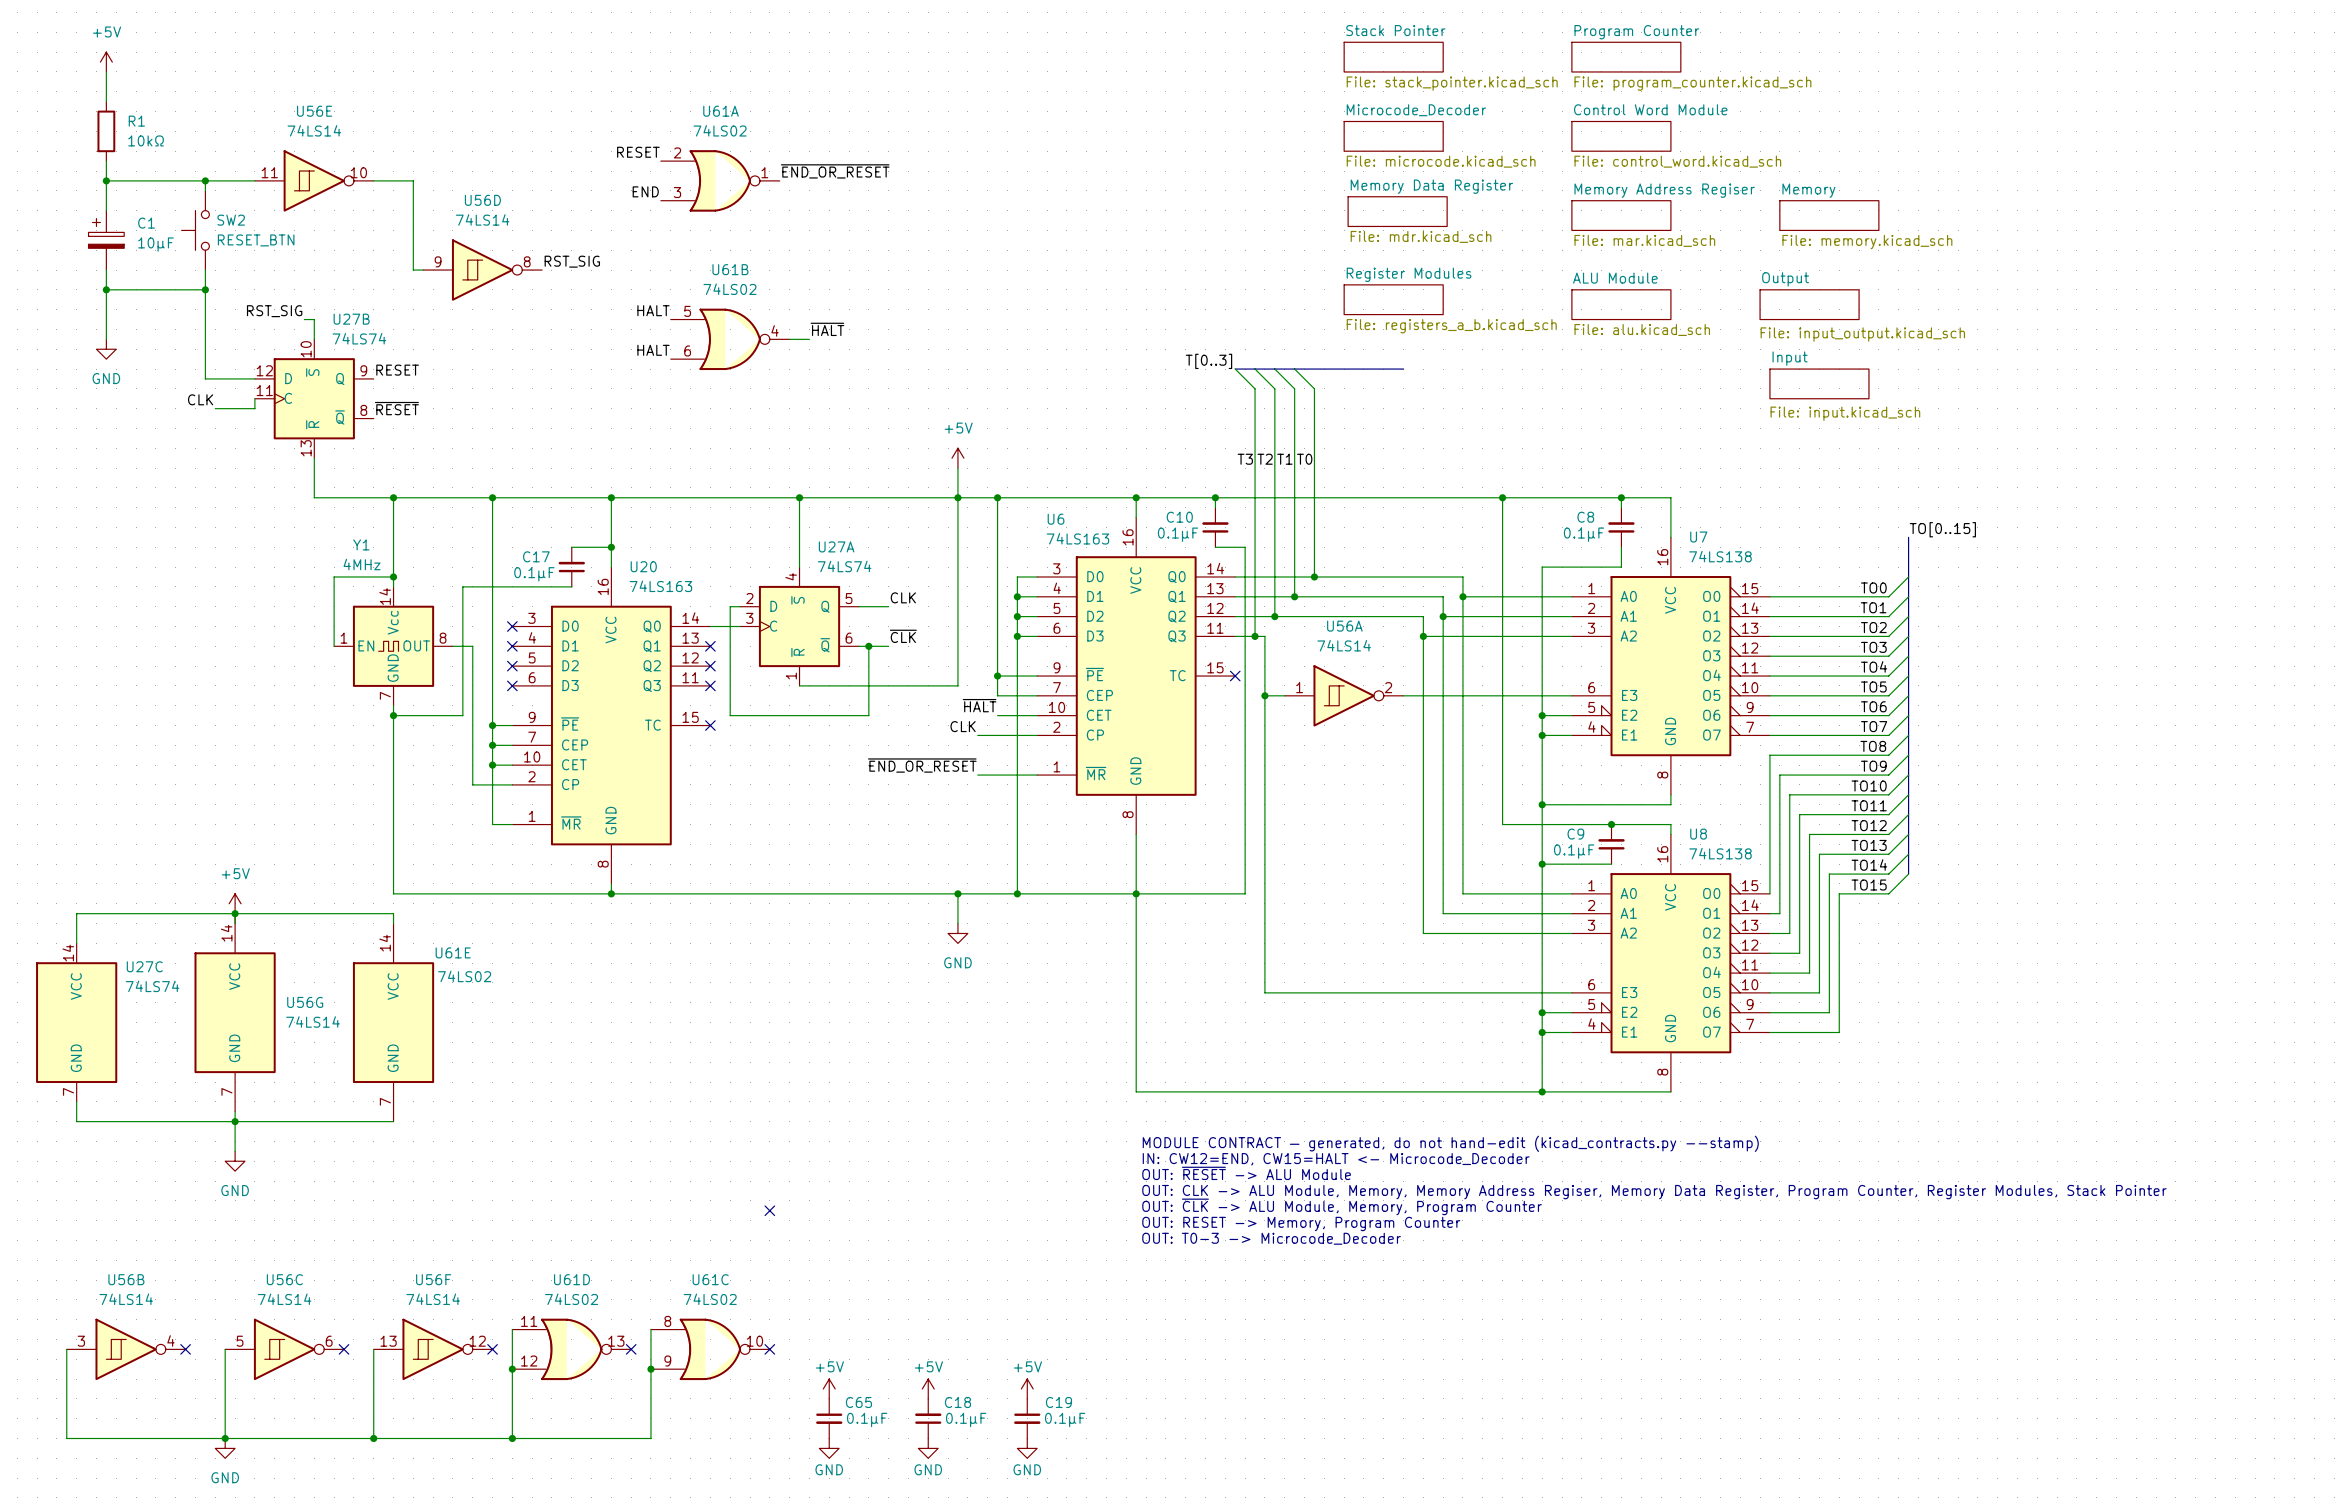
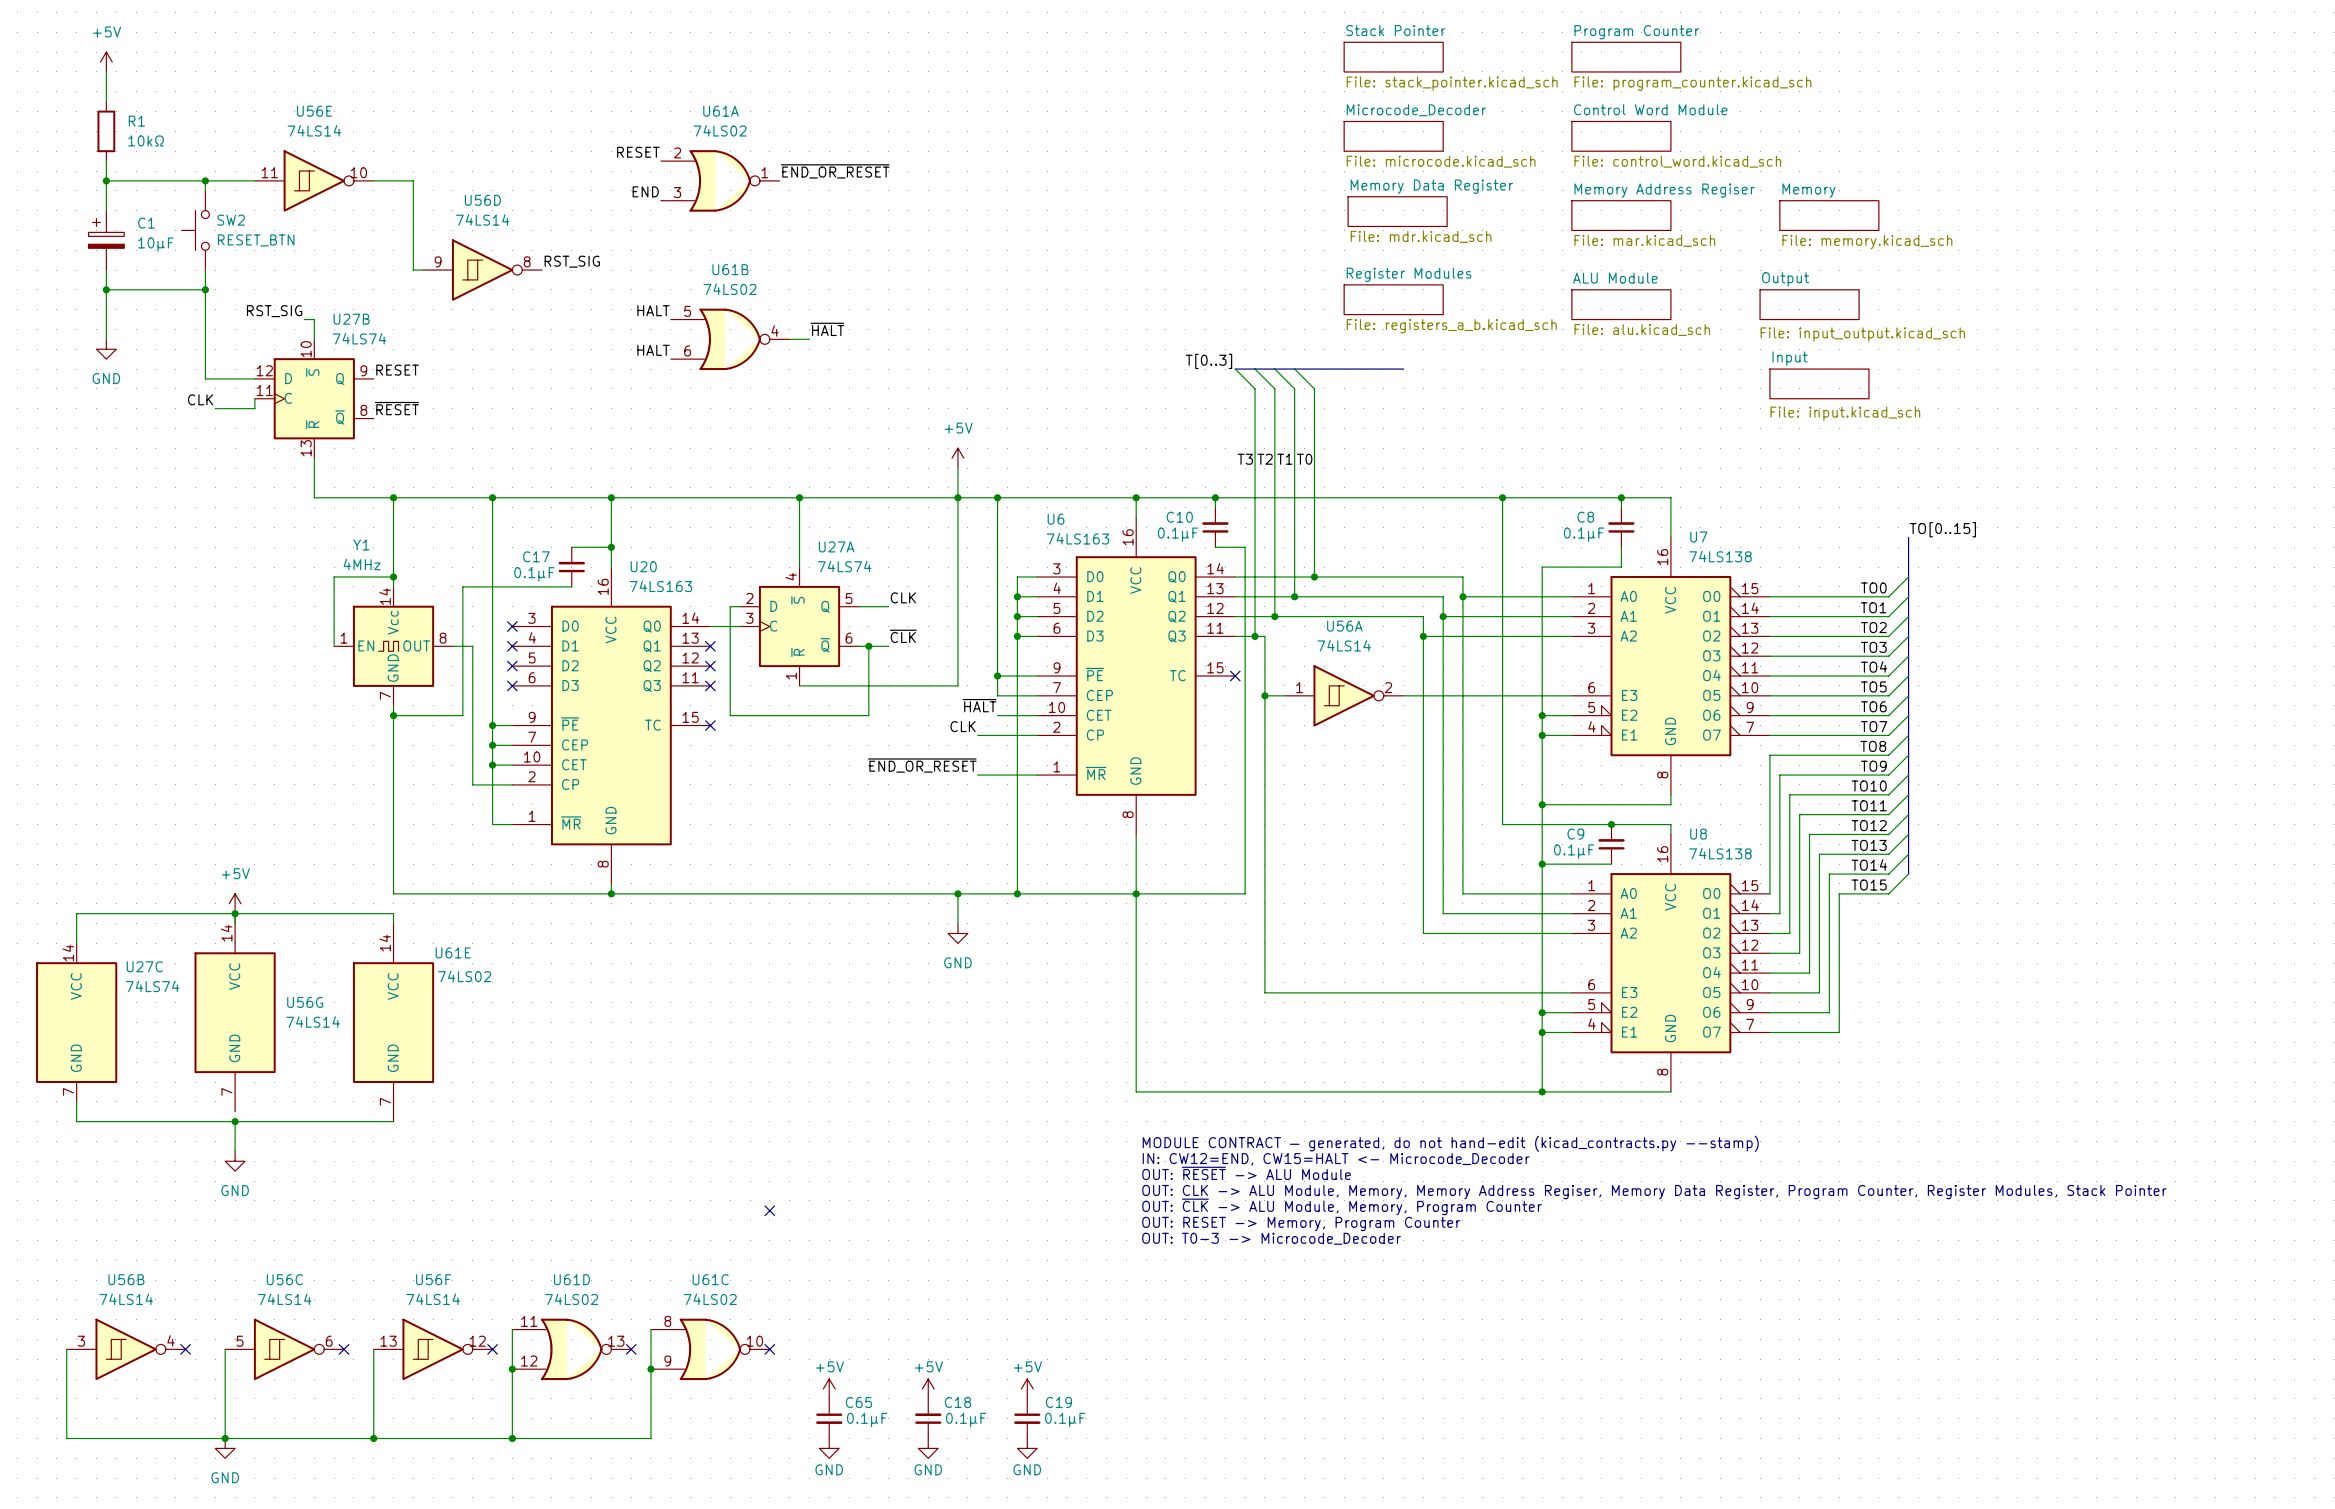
wire: (235, 1111) (235, 1121) -> none

